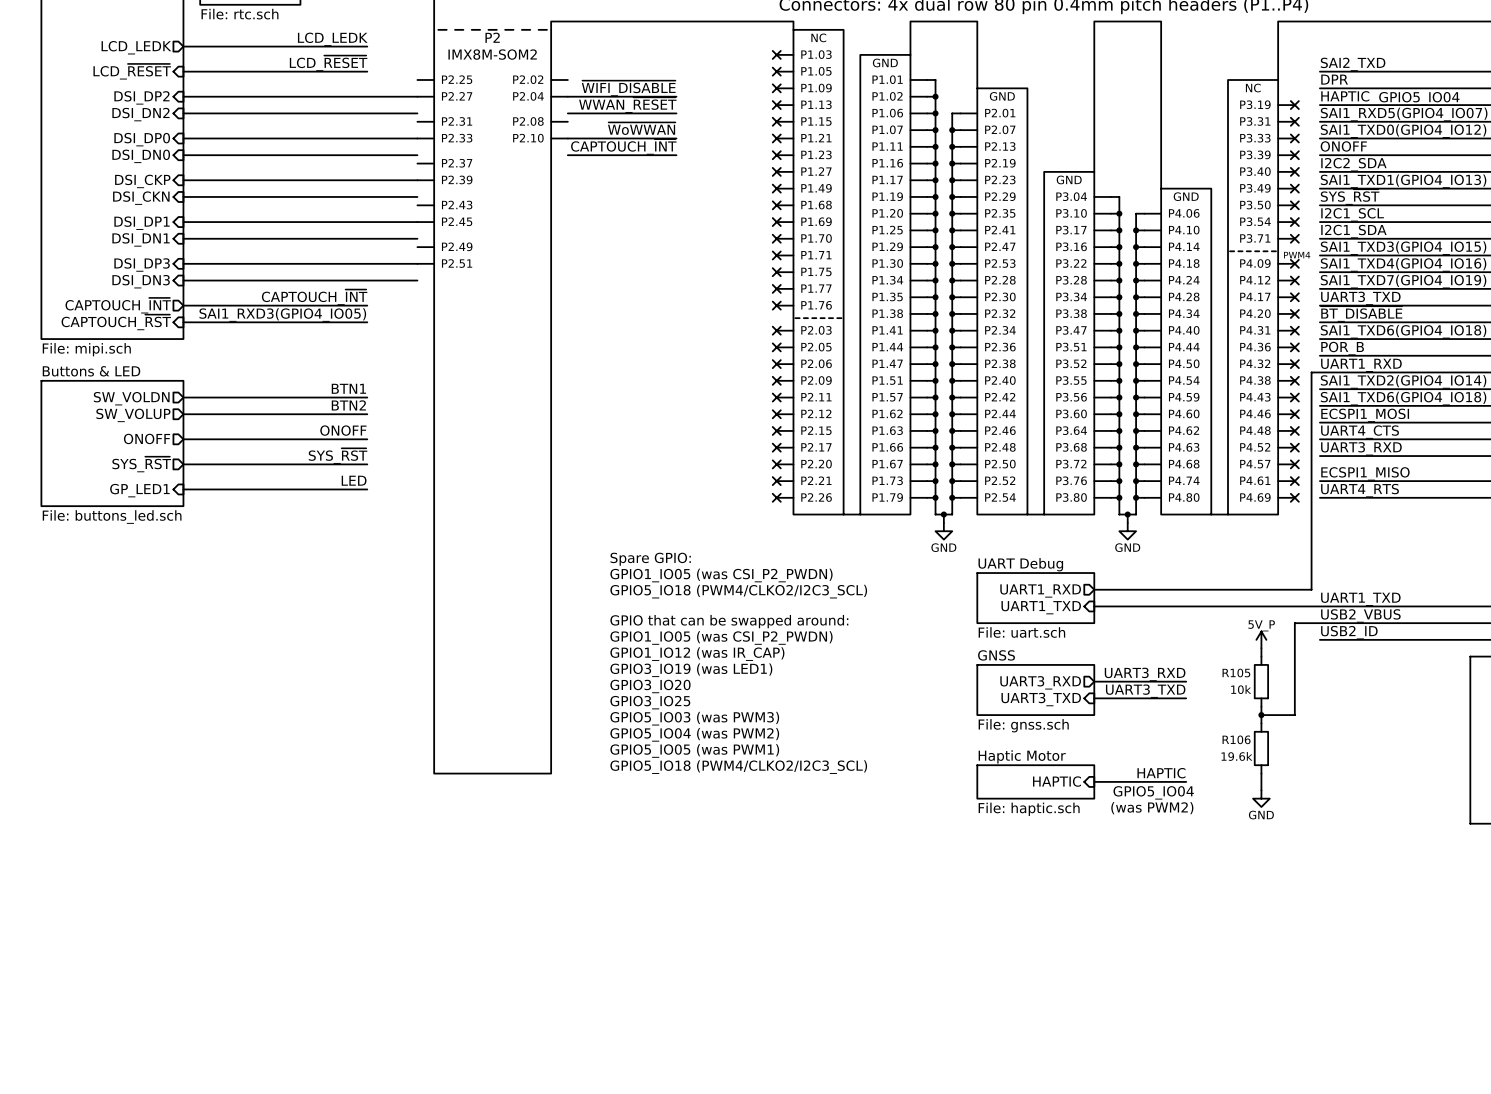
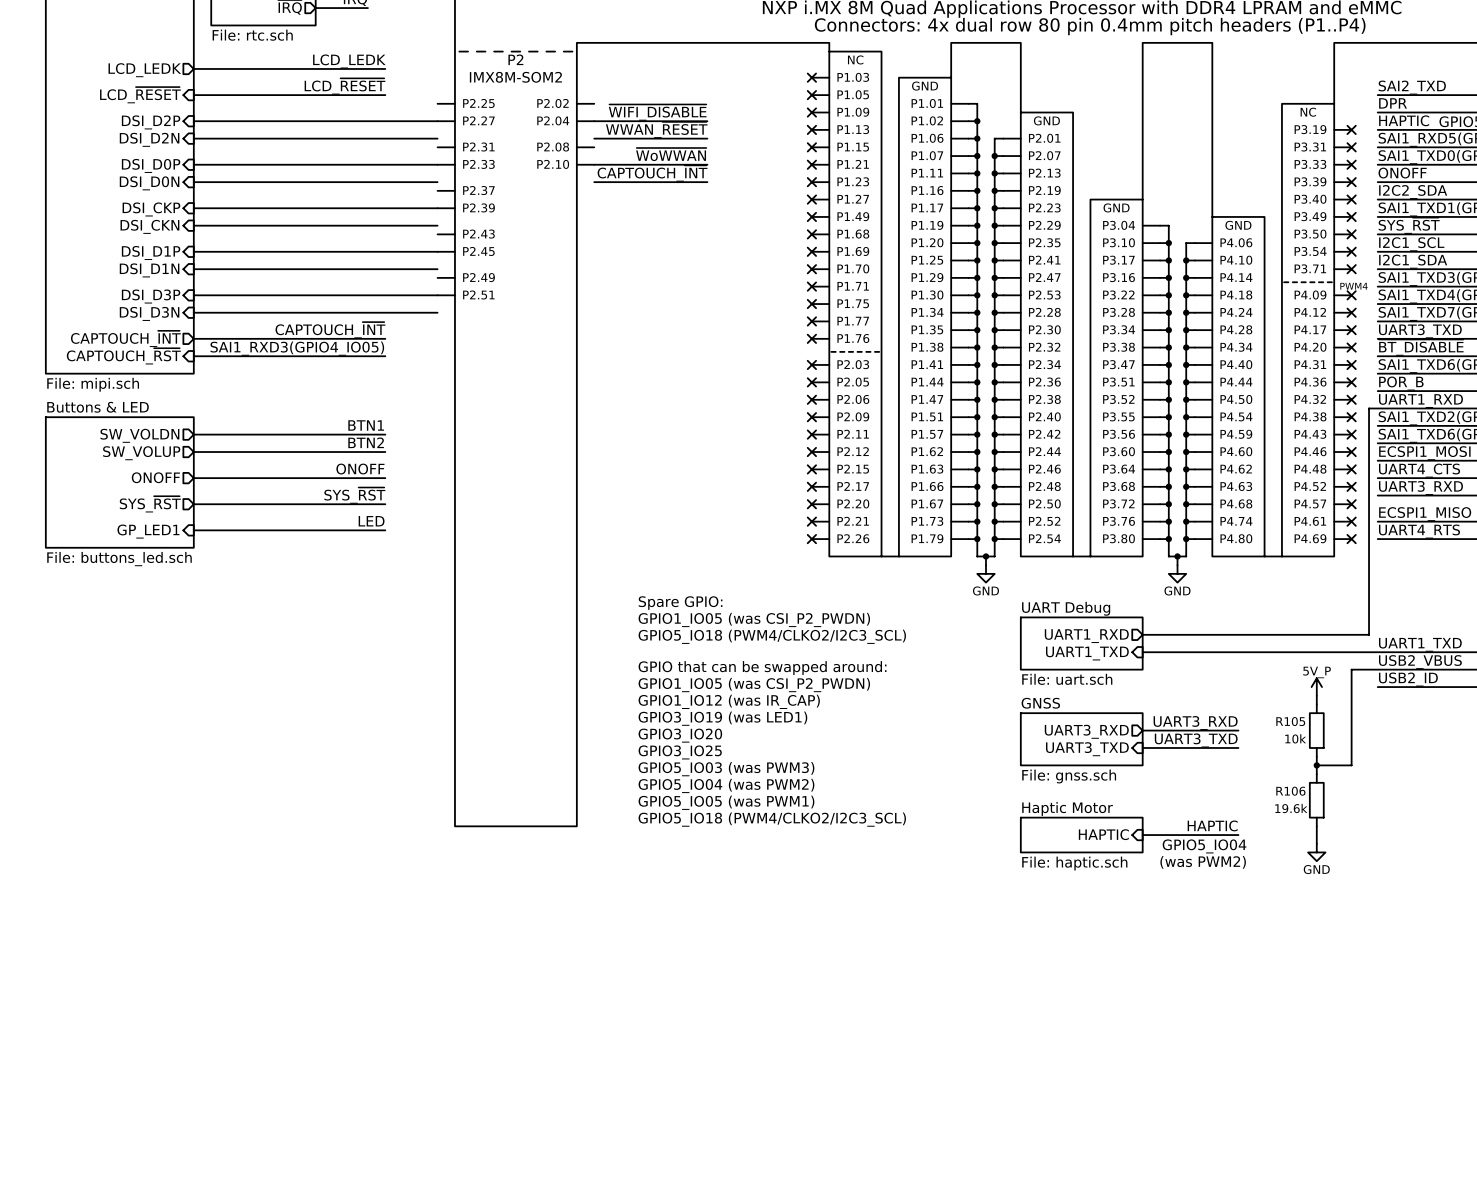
sheet pin: DSI_DP2 (141, 97) -> DSI_D2P (151, 122)
sheet pin: DSI_DN2 (140, 114) -> DSI_D2N (149, 139)
sheet pin: DSI_DP0 (142, 139) -> DSI_D0P (151, 165)
sheet pin: DSI_DN0 (141, 156) -> DSI_D0N (149, 183)
sheet pin: DSI_DP1 (142, 223) -> DSI_D1P (151, 253)
sheet pin: DSI_DN1 (141, 239) -> DSI_D1N (149, 270)
sheet pin: DSI_DP3 (142, 264) -> DSI_D3P (151, 296)
sheet pin: DSI_DN3 (141, 281) -> DSI_D3N (149, 313)

